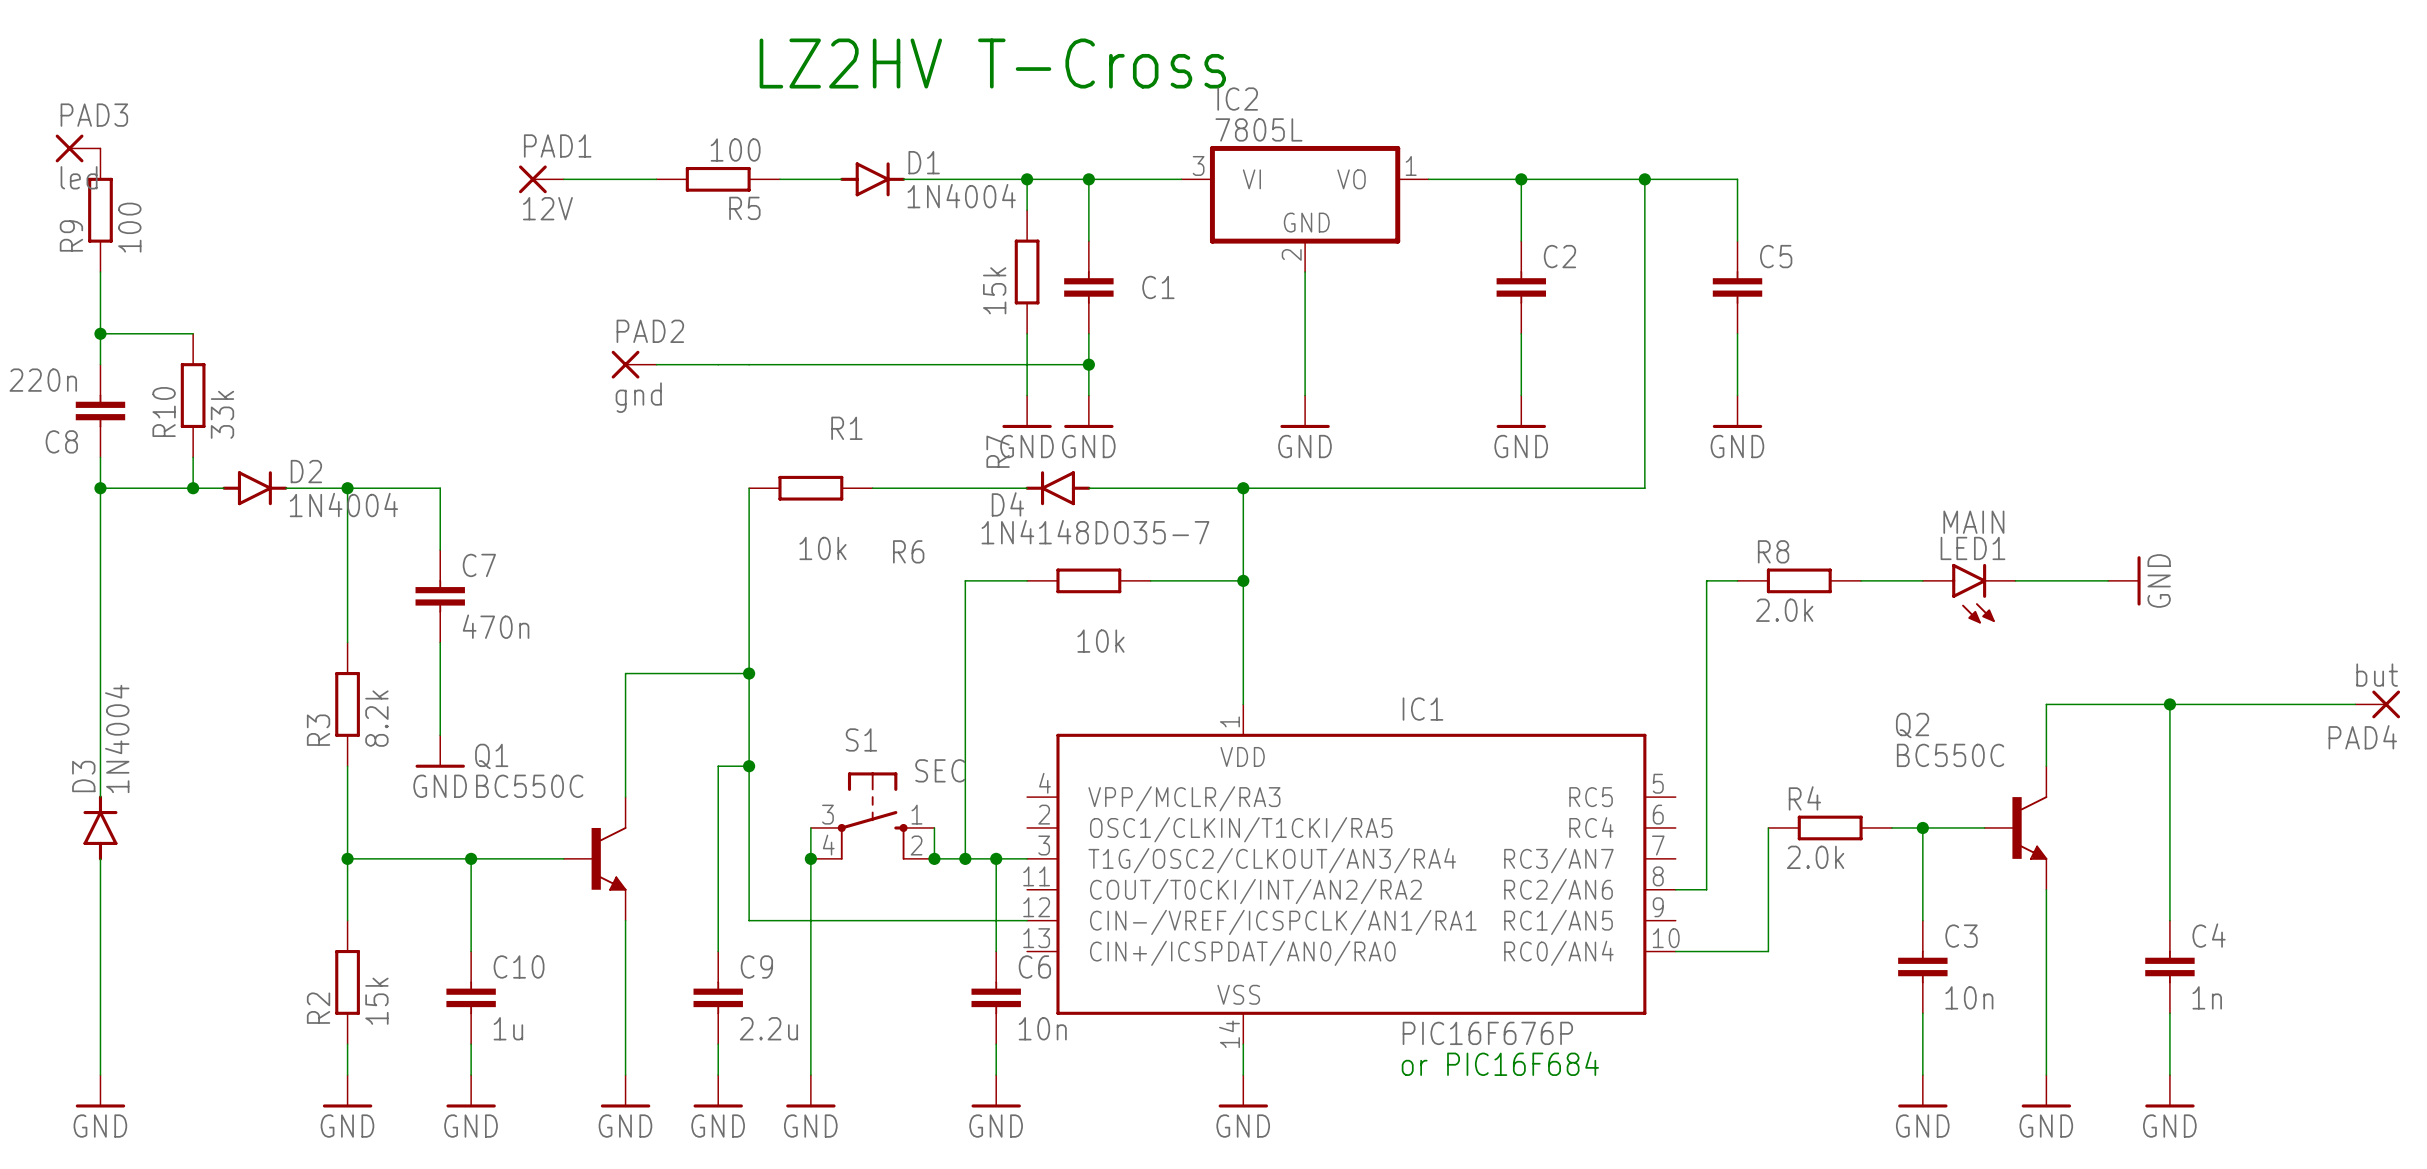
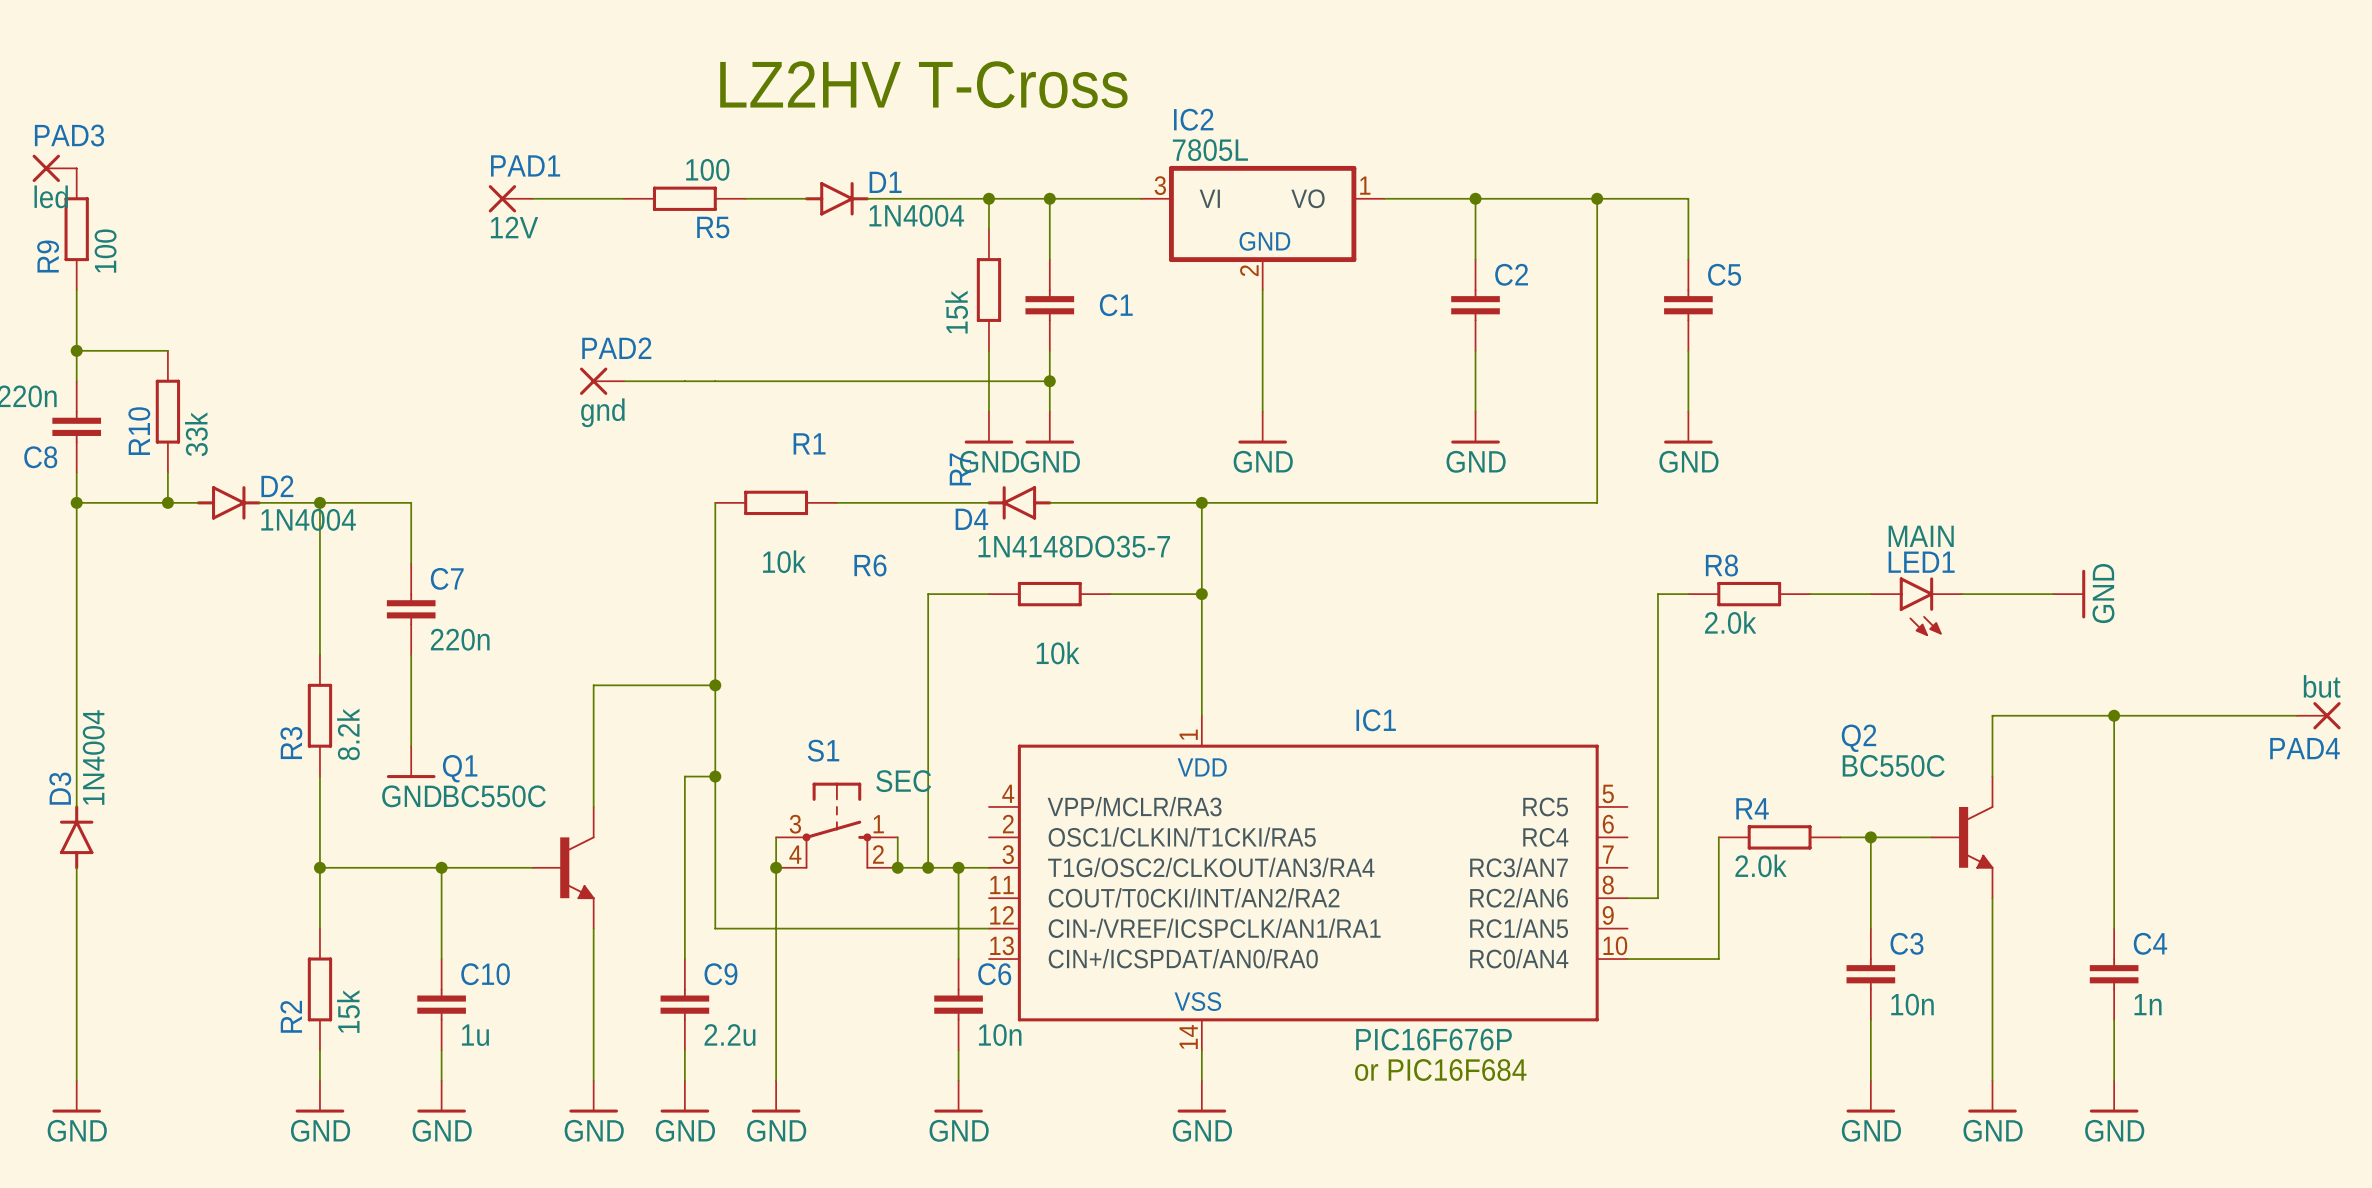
C7 value: 470n (496, 626) -> 220n (460, 639)

